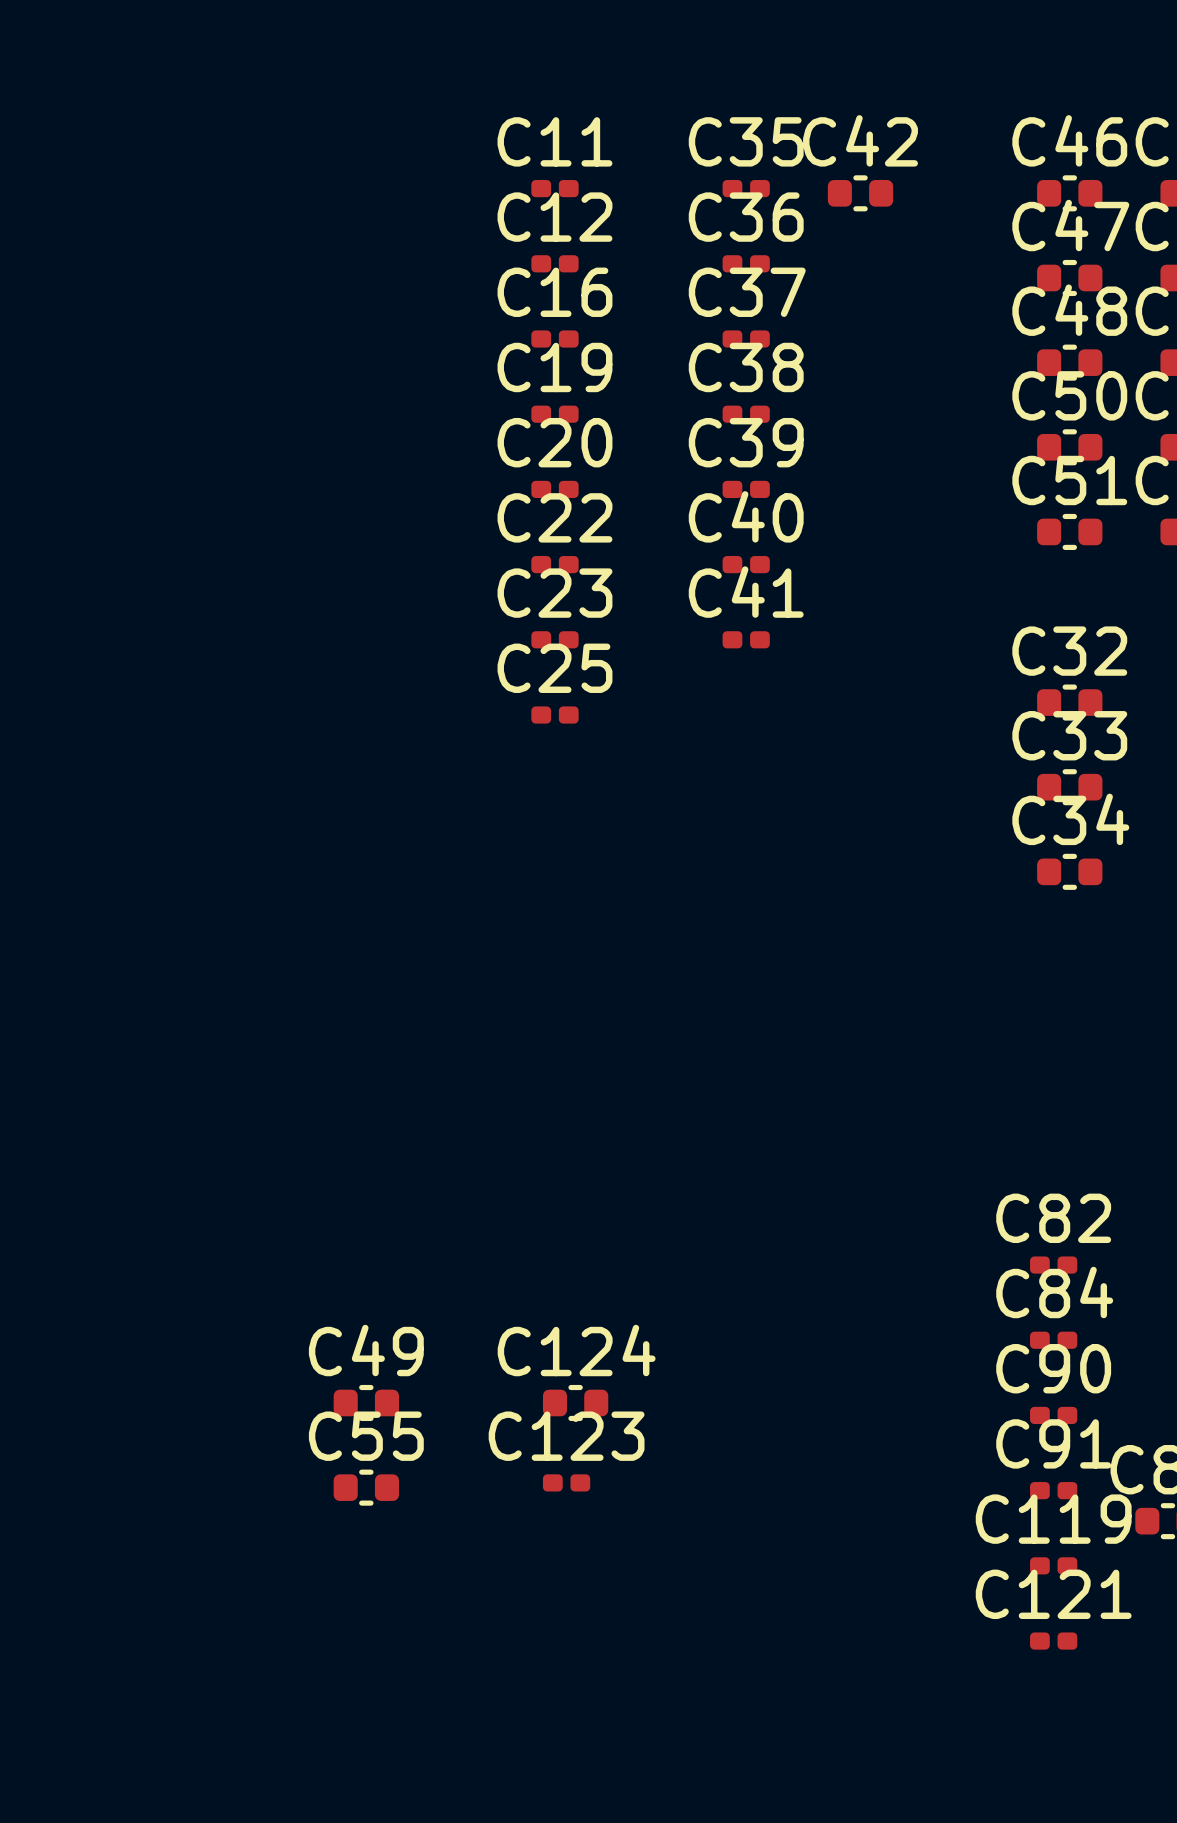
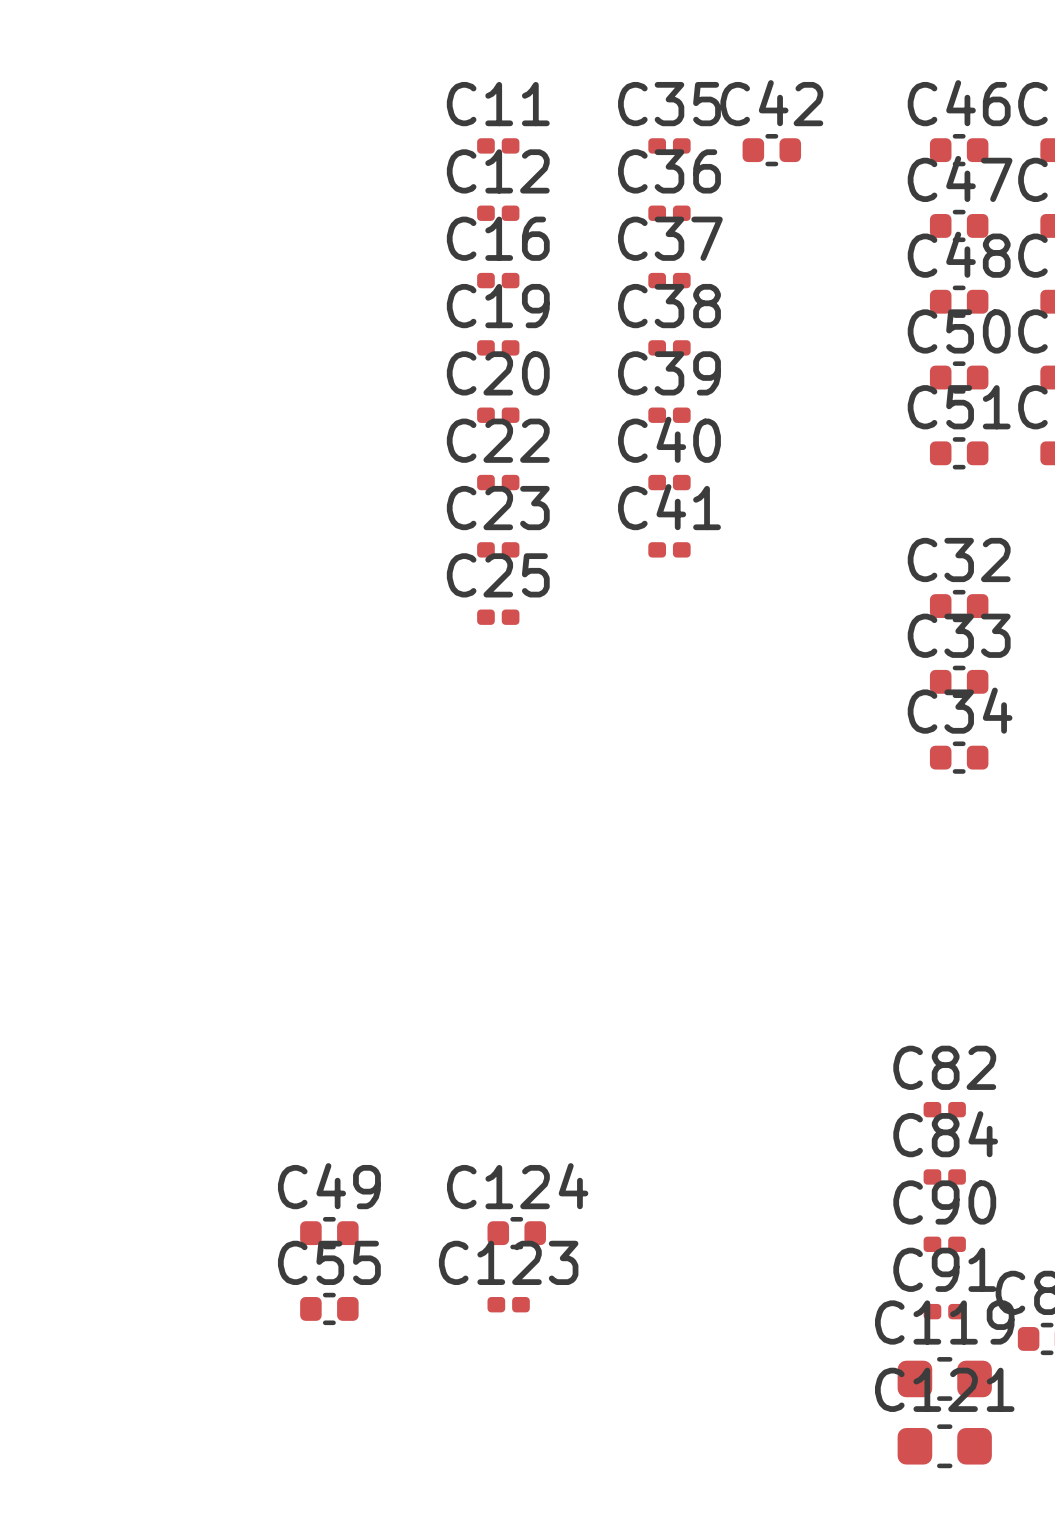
C119 footprint: [1030, 1557, 1078, 1575] -> [897, 1357, 992, 1401]
C121 footprint: [1030, 1632, 1078, 1650] -> [897, 1424, 992, 1469]

